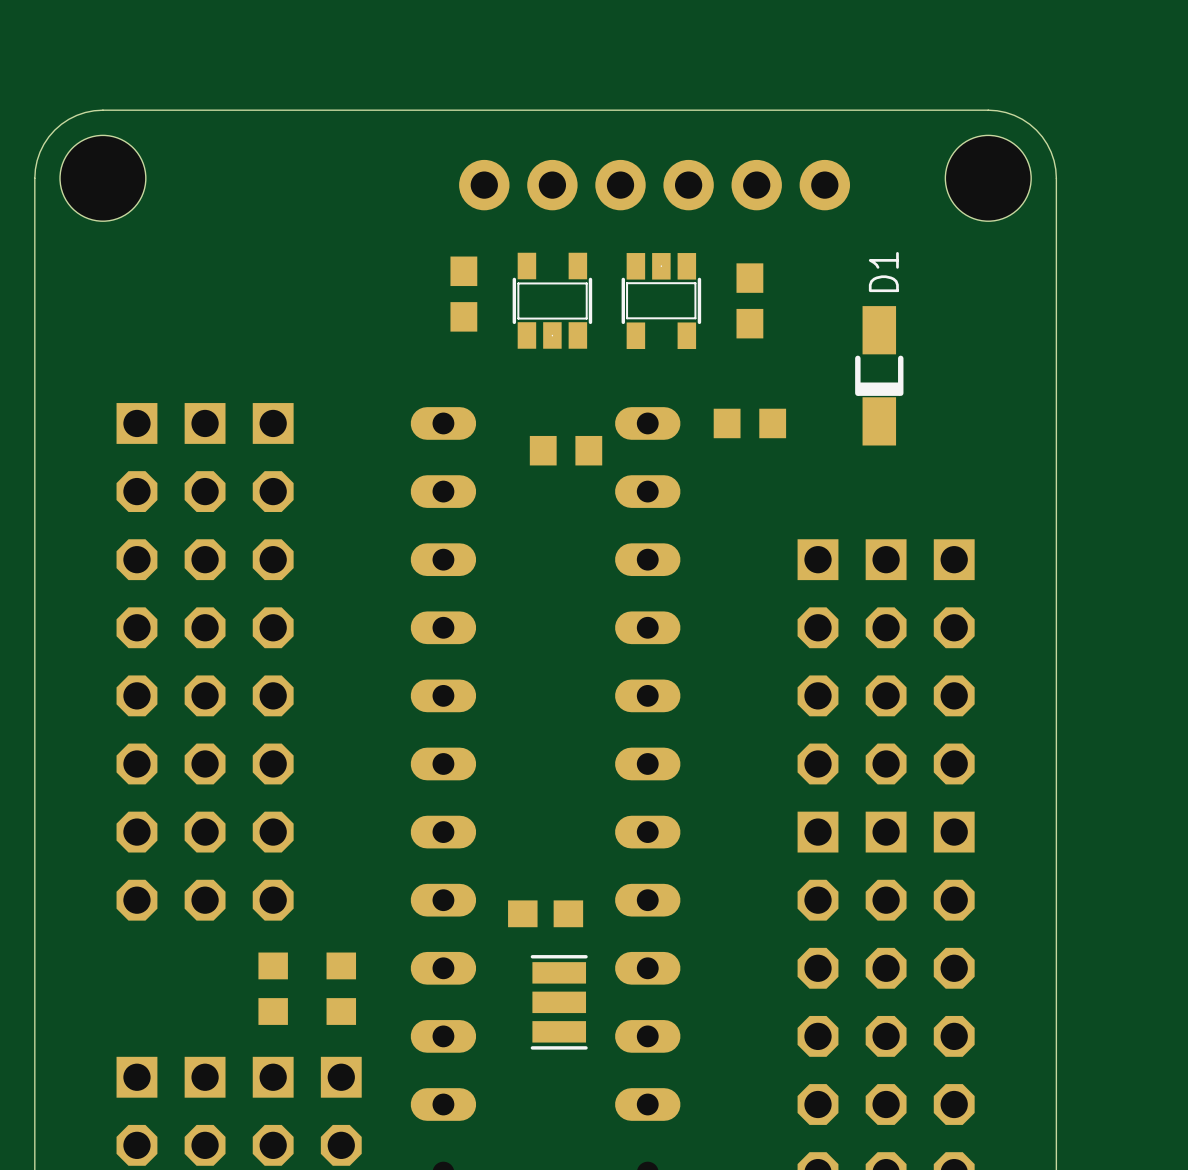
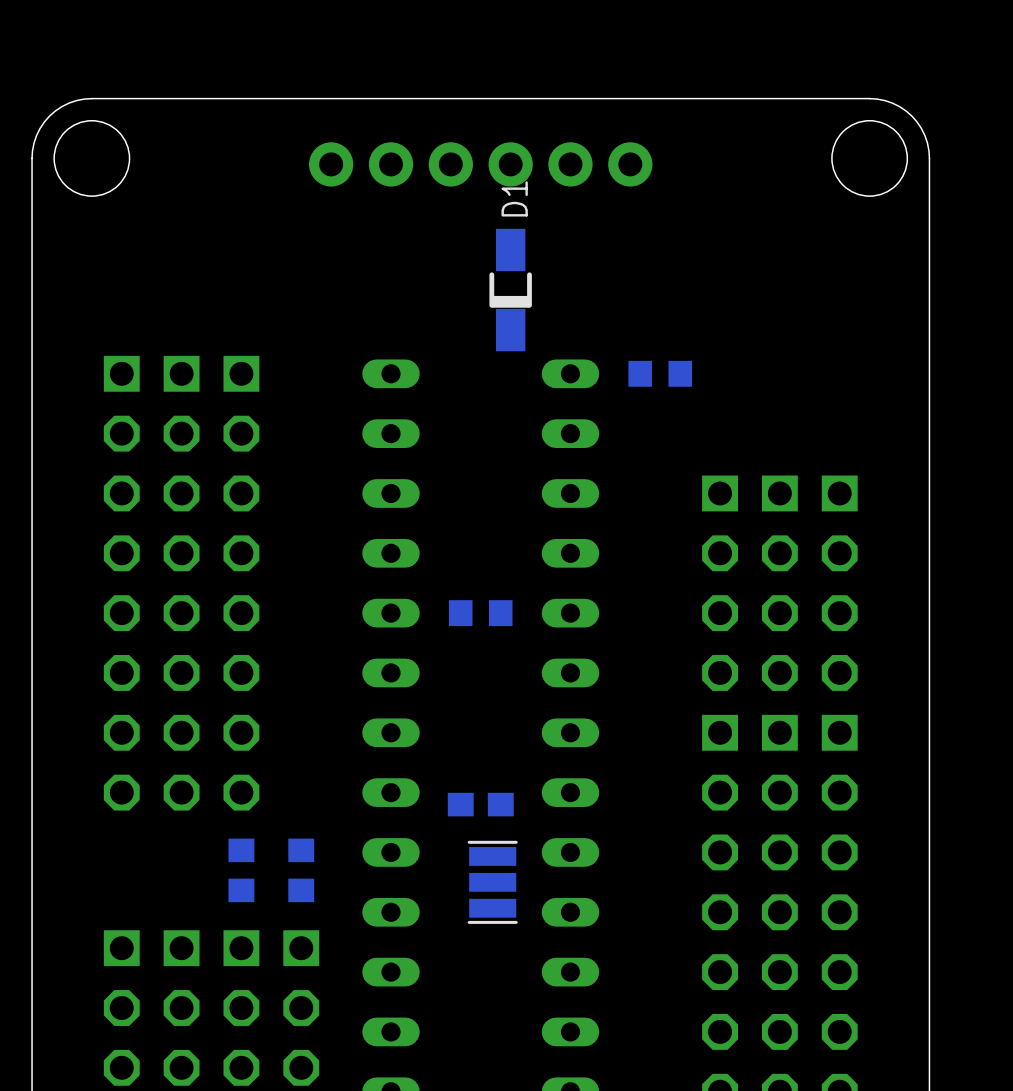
part position: (654, 185) -> (480, 164)
part: (463, 294) -> none
part: (552, 300) -> none
part: (749, 300) -> none
part: (661, 301) -> none
D1 position: (879, 375) -> (510, 290)
part position: (566, 450) -> (480, 613)

